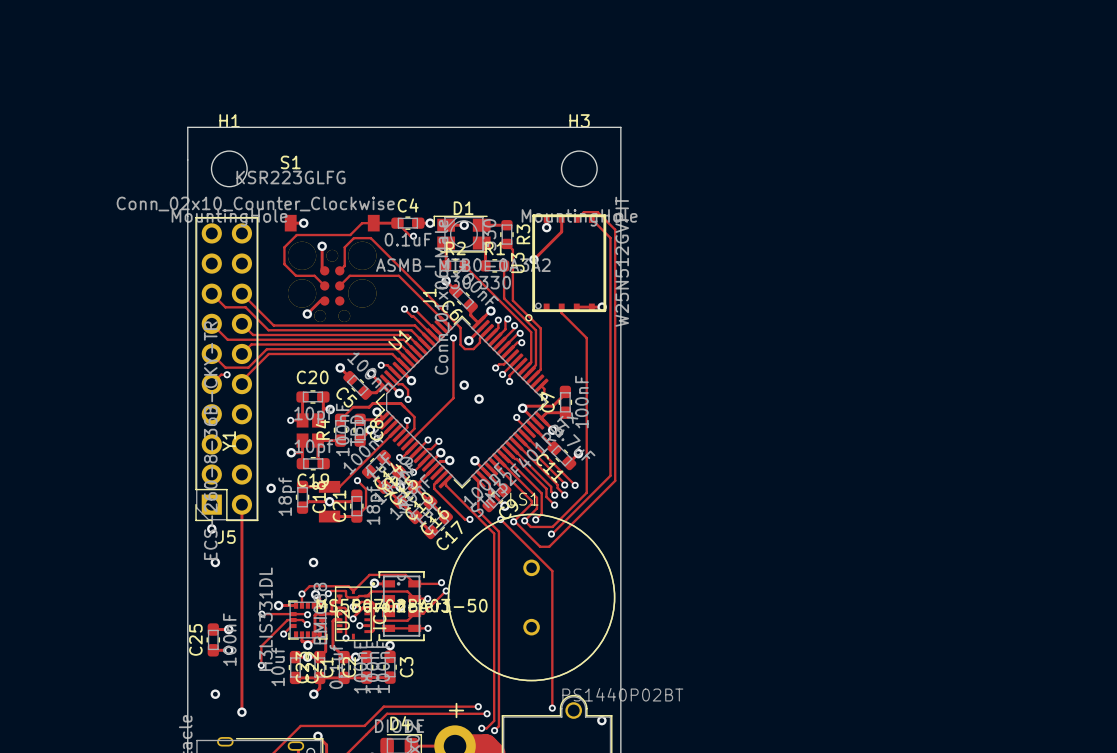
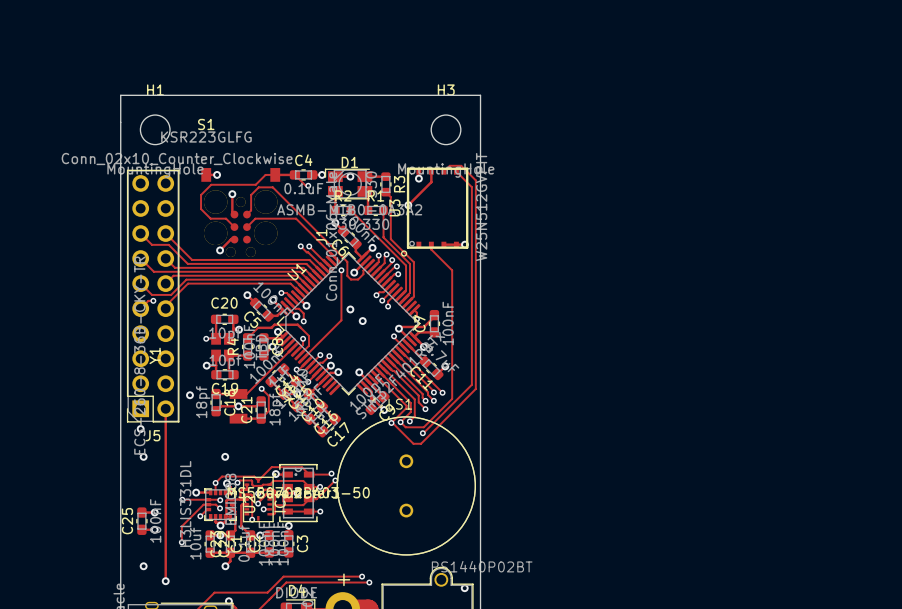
track: (441, 476) (434, 484) (434, 488) (464, 519) (469, 519) -> none
track: (446, 481) (446, 485) (494, 533) (494, 720) (486, 728) (481, 728) -> none
track: (478, 481) (478, 511) (498, 531) (498, 726) (494, 730) -> none
via: (469, 519) -> none
track: (500, 519) (552, 571) (552, 708) -> none
via: (500, 519) -> none
via: (552, 708) -> none
via: (481, 728) -> none
via: (494, 730) -> none

